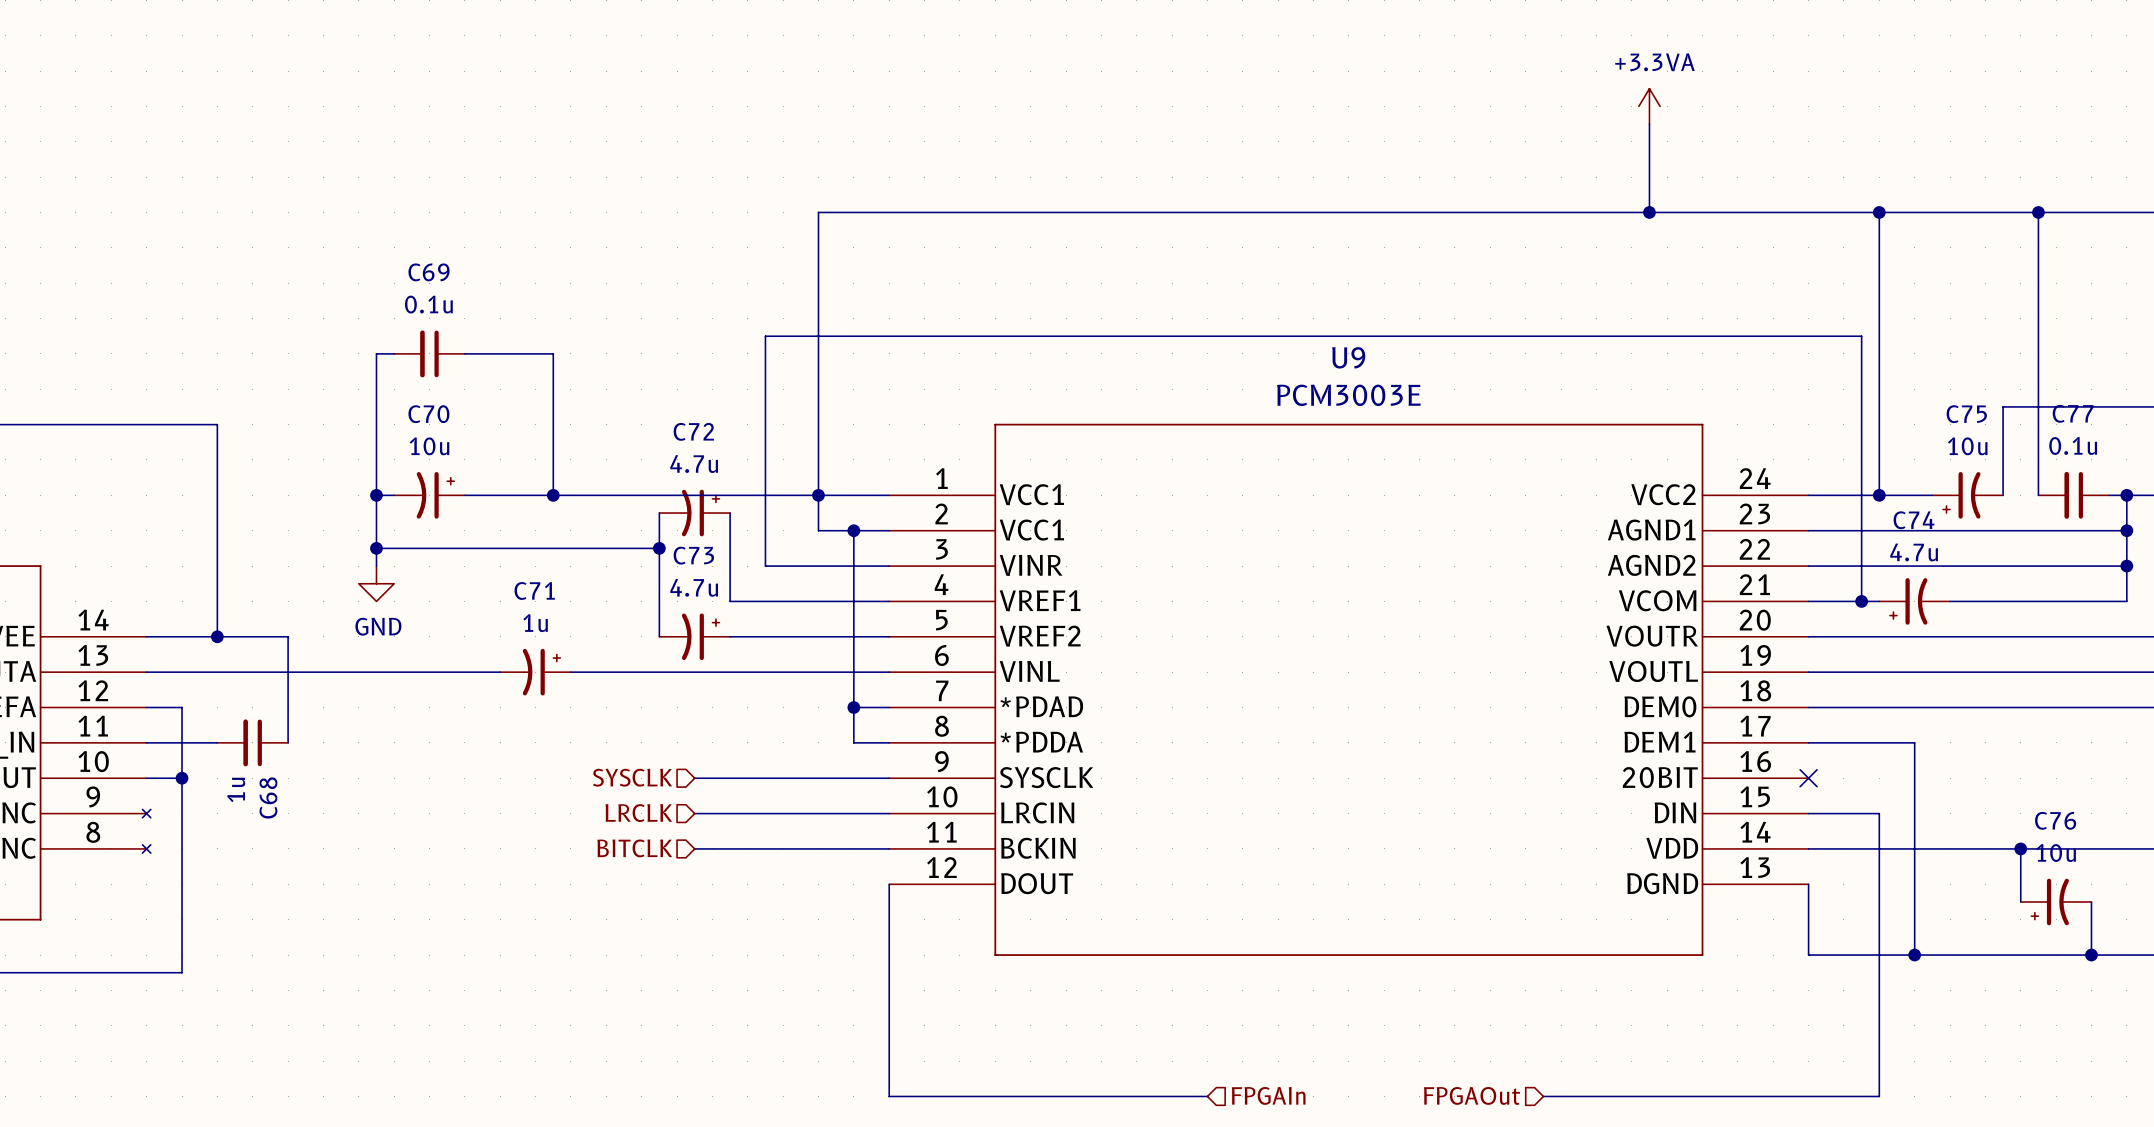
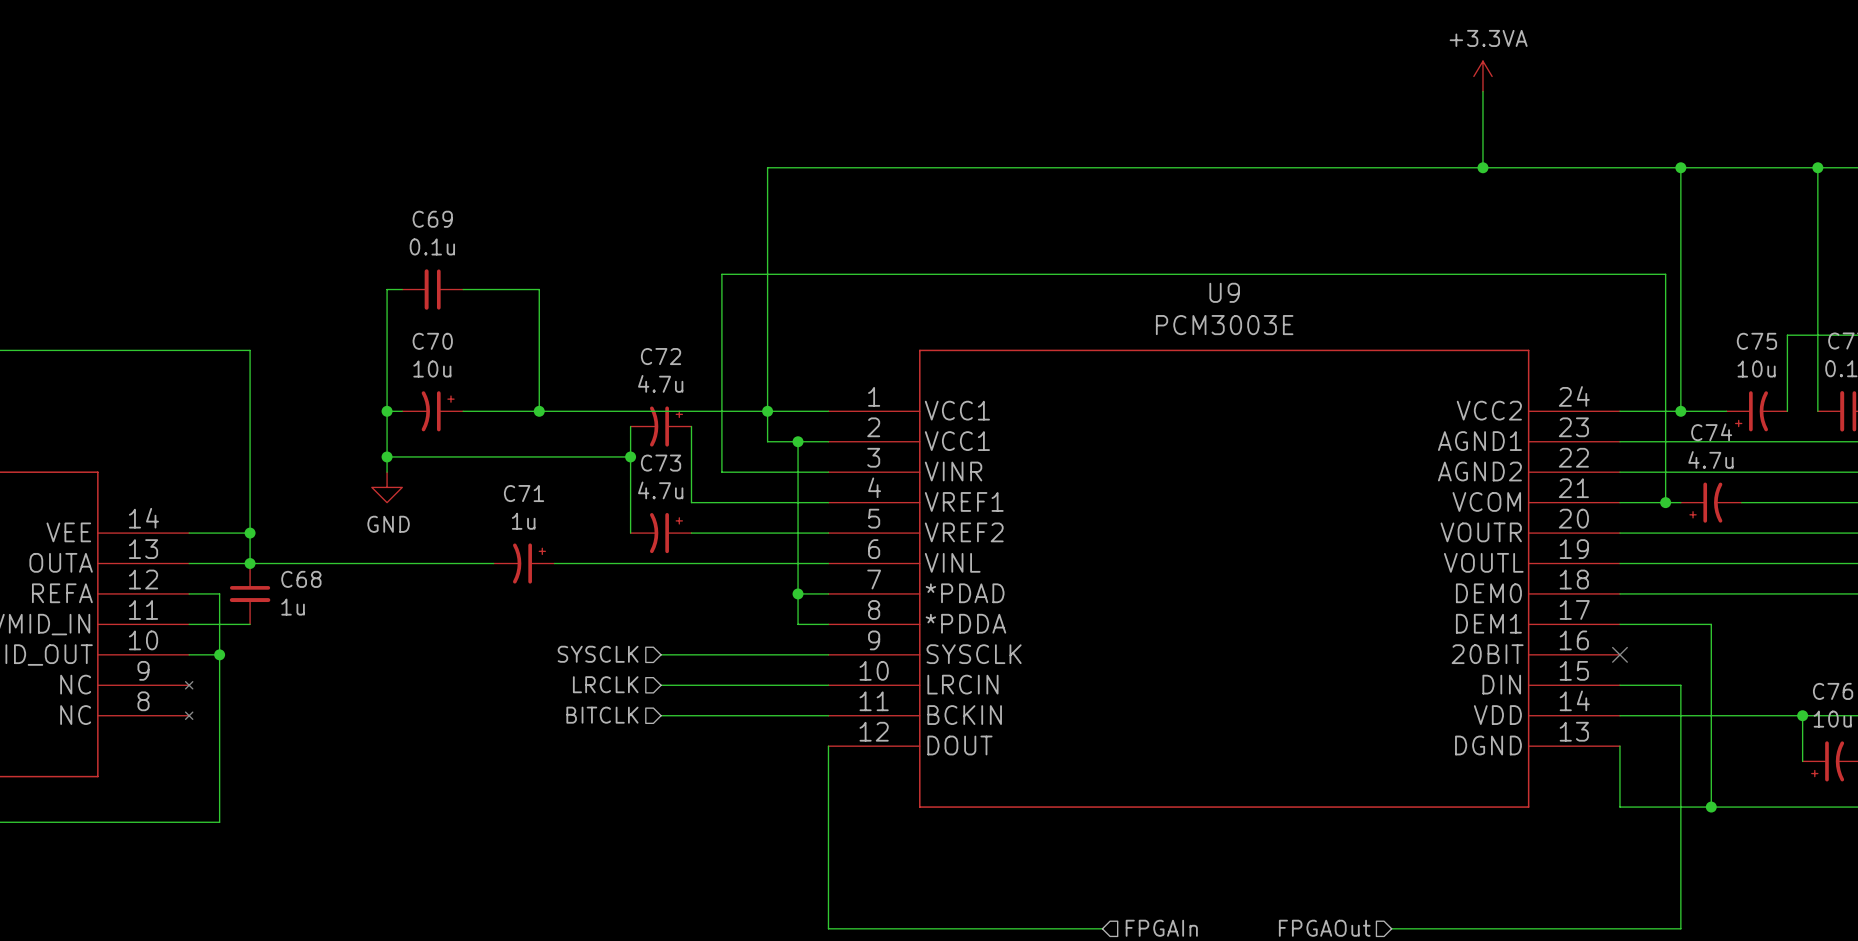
wire: (217, 636) (288, 636) (288, 742) -> (250, 533) (250, 563)
junction: none -> (250, 563)
C68 rotation: 0° (252, 742) -> 90° counterclockwise (250, 594)
C68 position: (252, 742) -> (250, 593)

